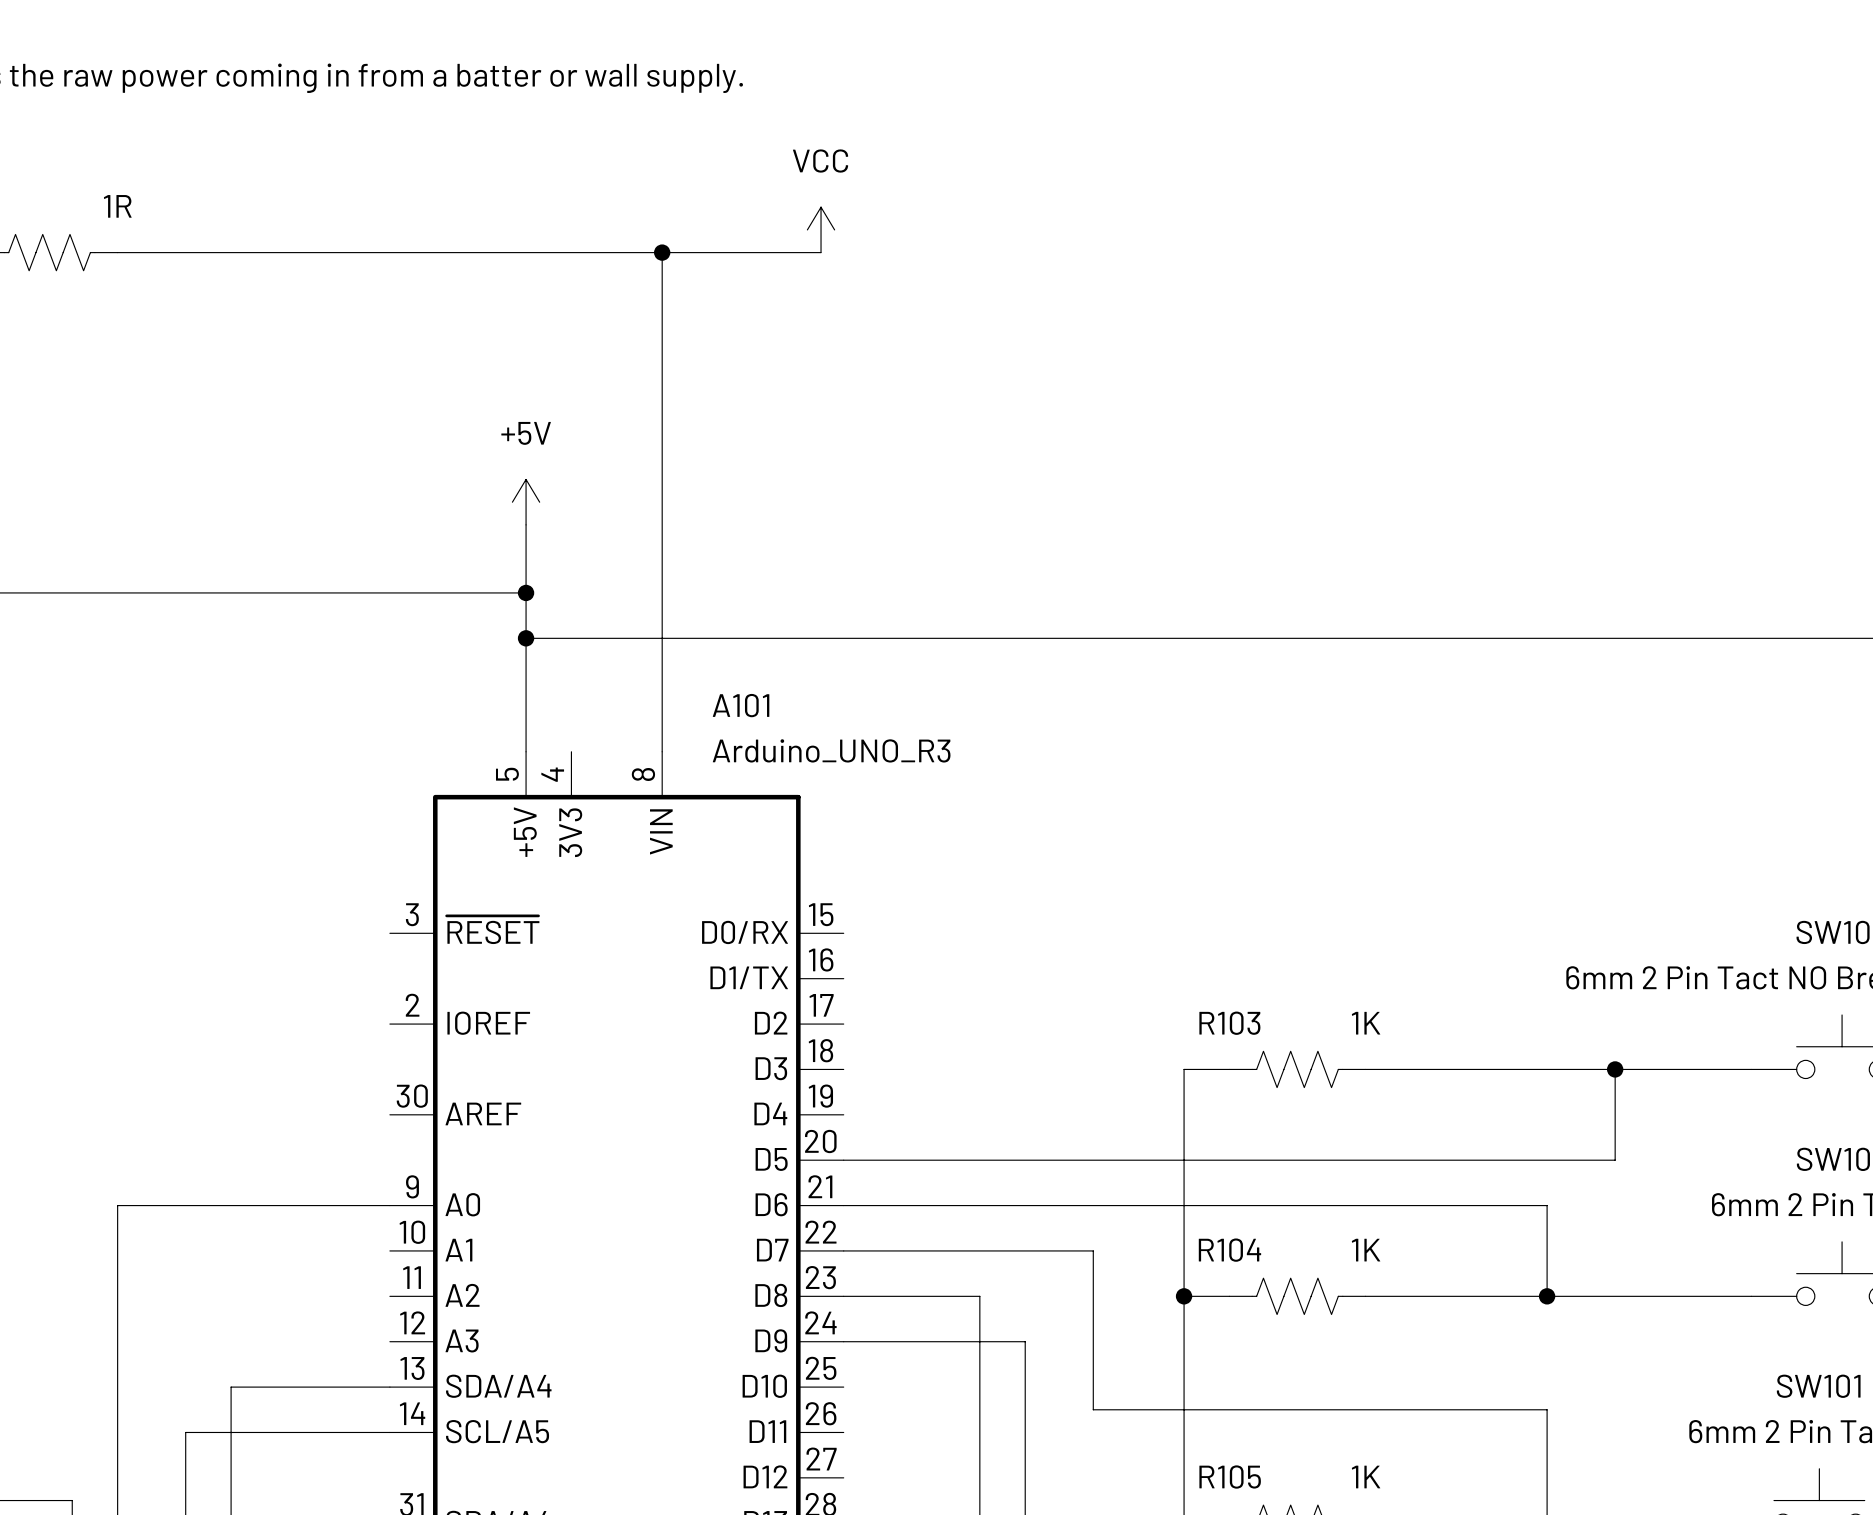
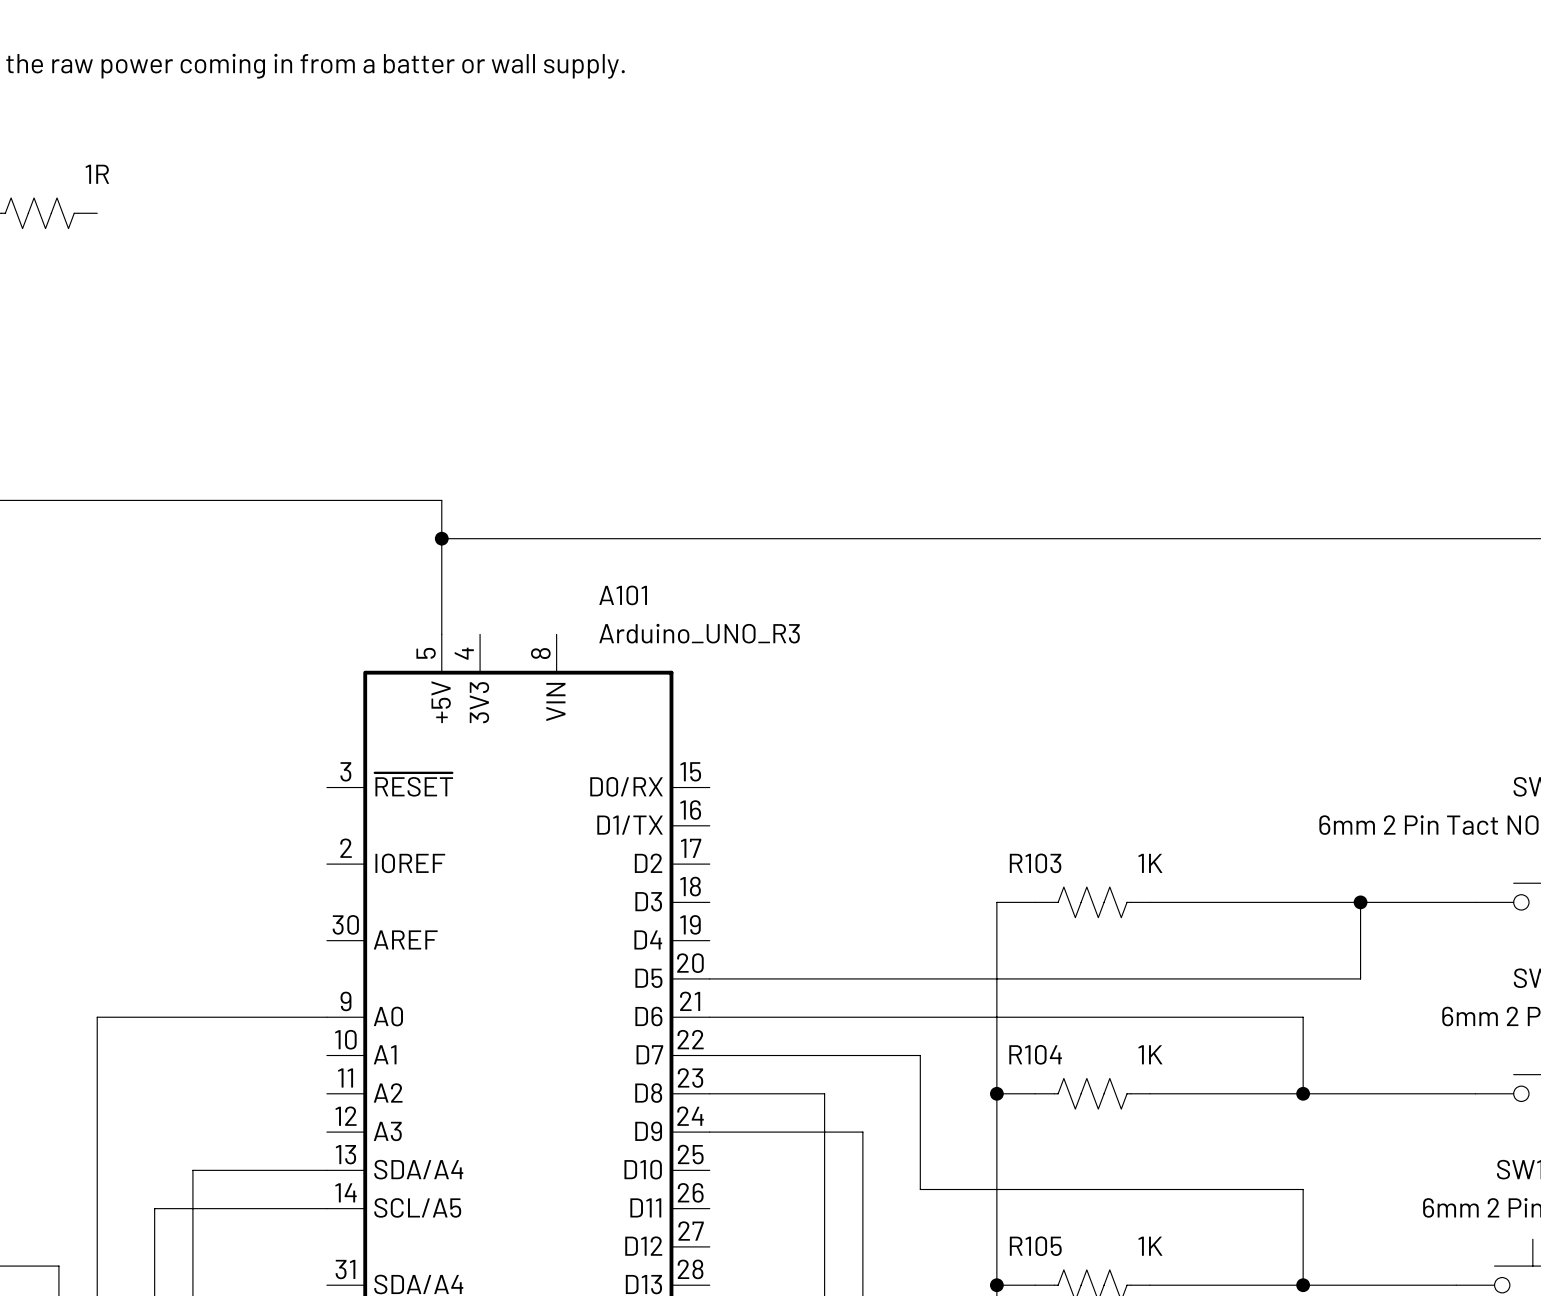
power symbol: VCC (821, 229) -> none
wire: (117, 252) (821, 252) -> none
wire: (662, 252) (662, 751) -> none
junction: (662, 252) -> none
power symbol: +5V (526, 502) -> none
wire: (526, 524) (526, 592) -> none
junction: (526, 592) -> none

